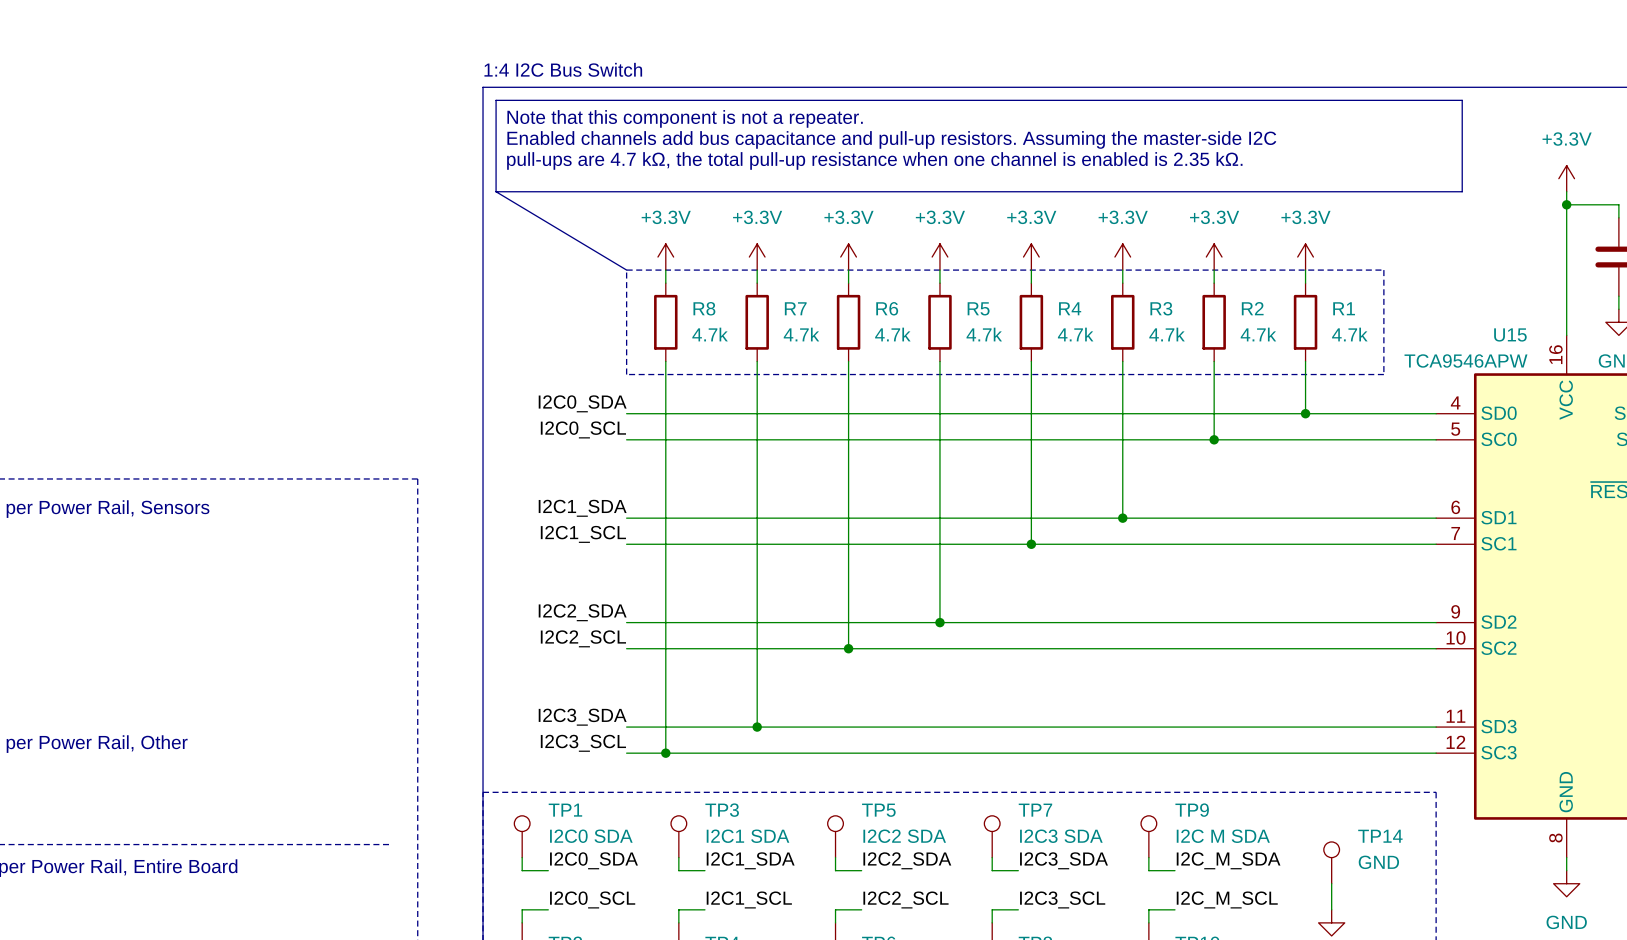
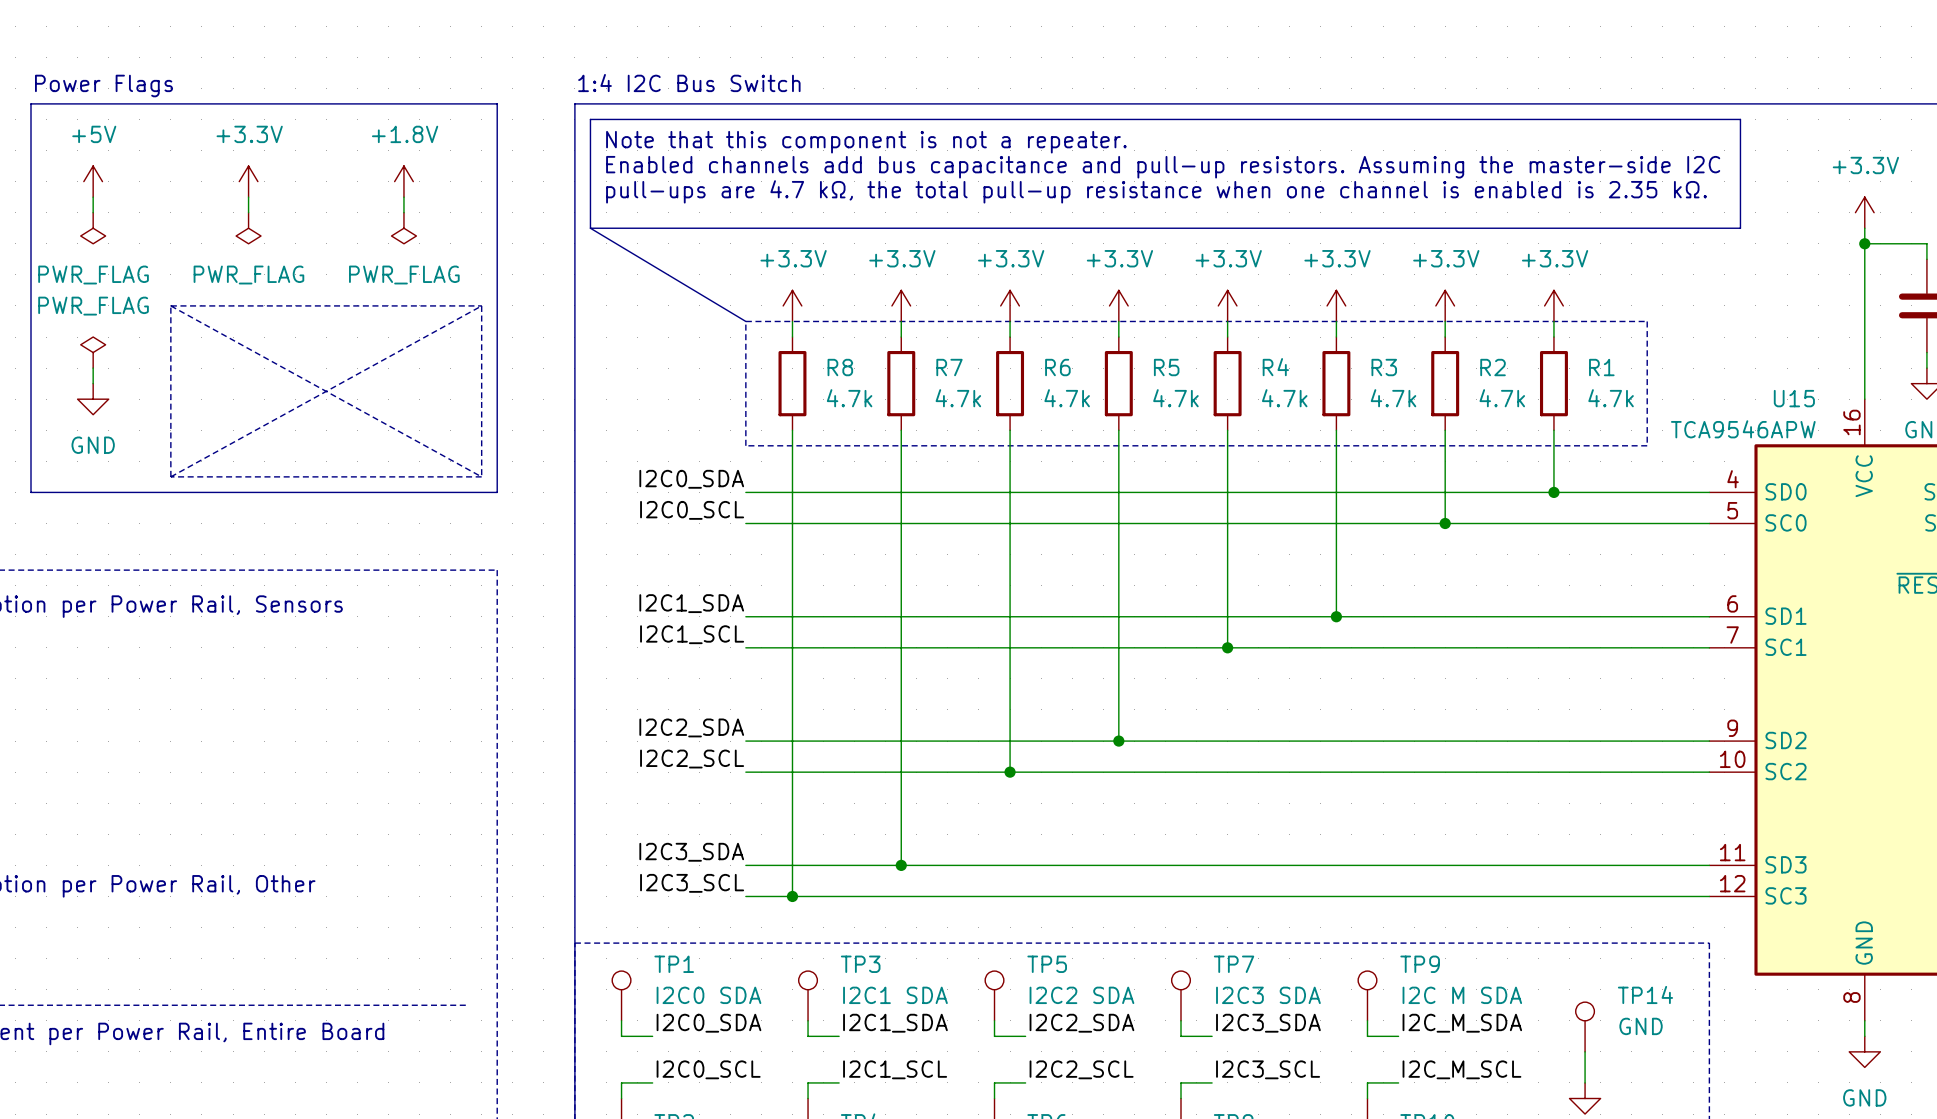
text: none -> Power Flags (104, 86)
line: none -> (31, 103) (497, 103) (497, 492) (31, 492) (31, 103)
power symbol: none -> +5V (93, 181)
power symbol: none -> +3.3V (248, 181)
power symbol: none -> +1.8V (403, 181)
wire: none -> (93, 197) (93, 212)
wire: none -> (248, 197) (248, 212)
wire: none -> (403, 197) (403, 212)
power symbol: none -> PWR_FLAG (93, 228)
power symbol: none -> PWR_FLAG (248, 228)
power symbol: none -> PWR_FLAG (403, 228)
line: none -> (170, 305) (481, 305)
line: none -> (170, 305) (170, 476)
line: none -> (170, 305) (481, 476)
line: none -> (481, 305) (481, 476)
line: none -> (481, 305) (170, 476)
power symbol: none -> PWR_FLAG (93, 352)
wire: none -> (93, 368) (93, 383)
power symbol: none -> GND (93, 399)
line: none -> (170, 476) (481, 476)

